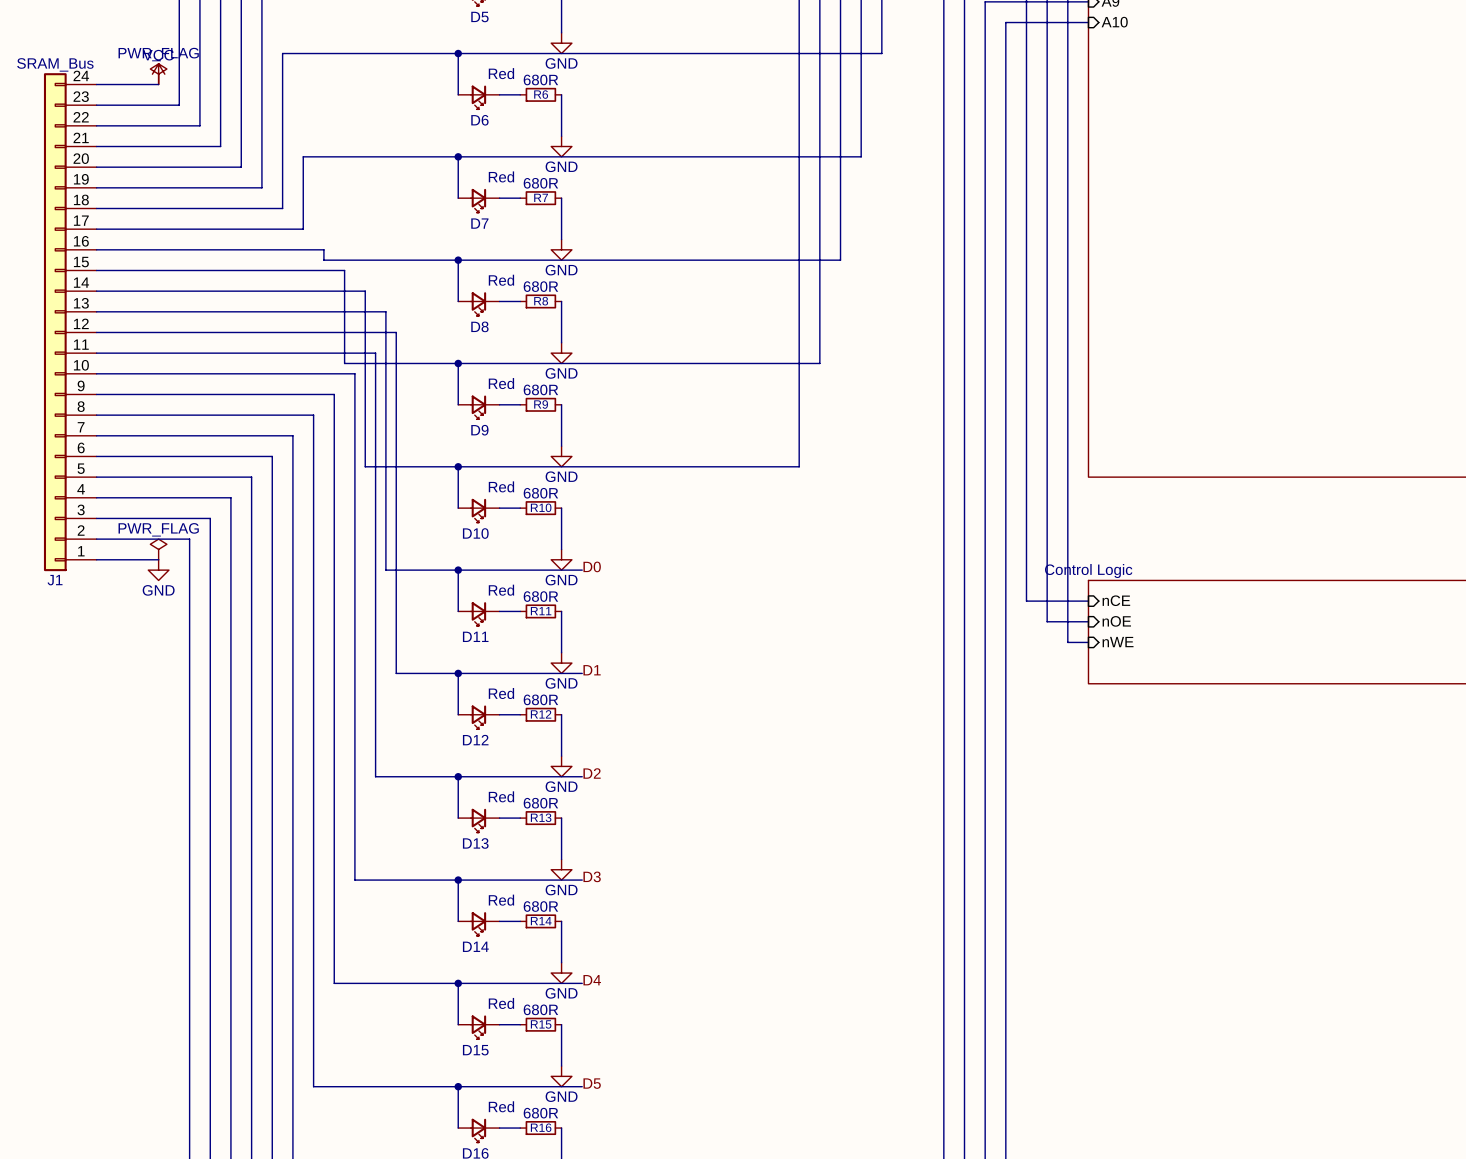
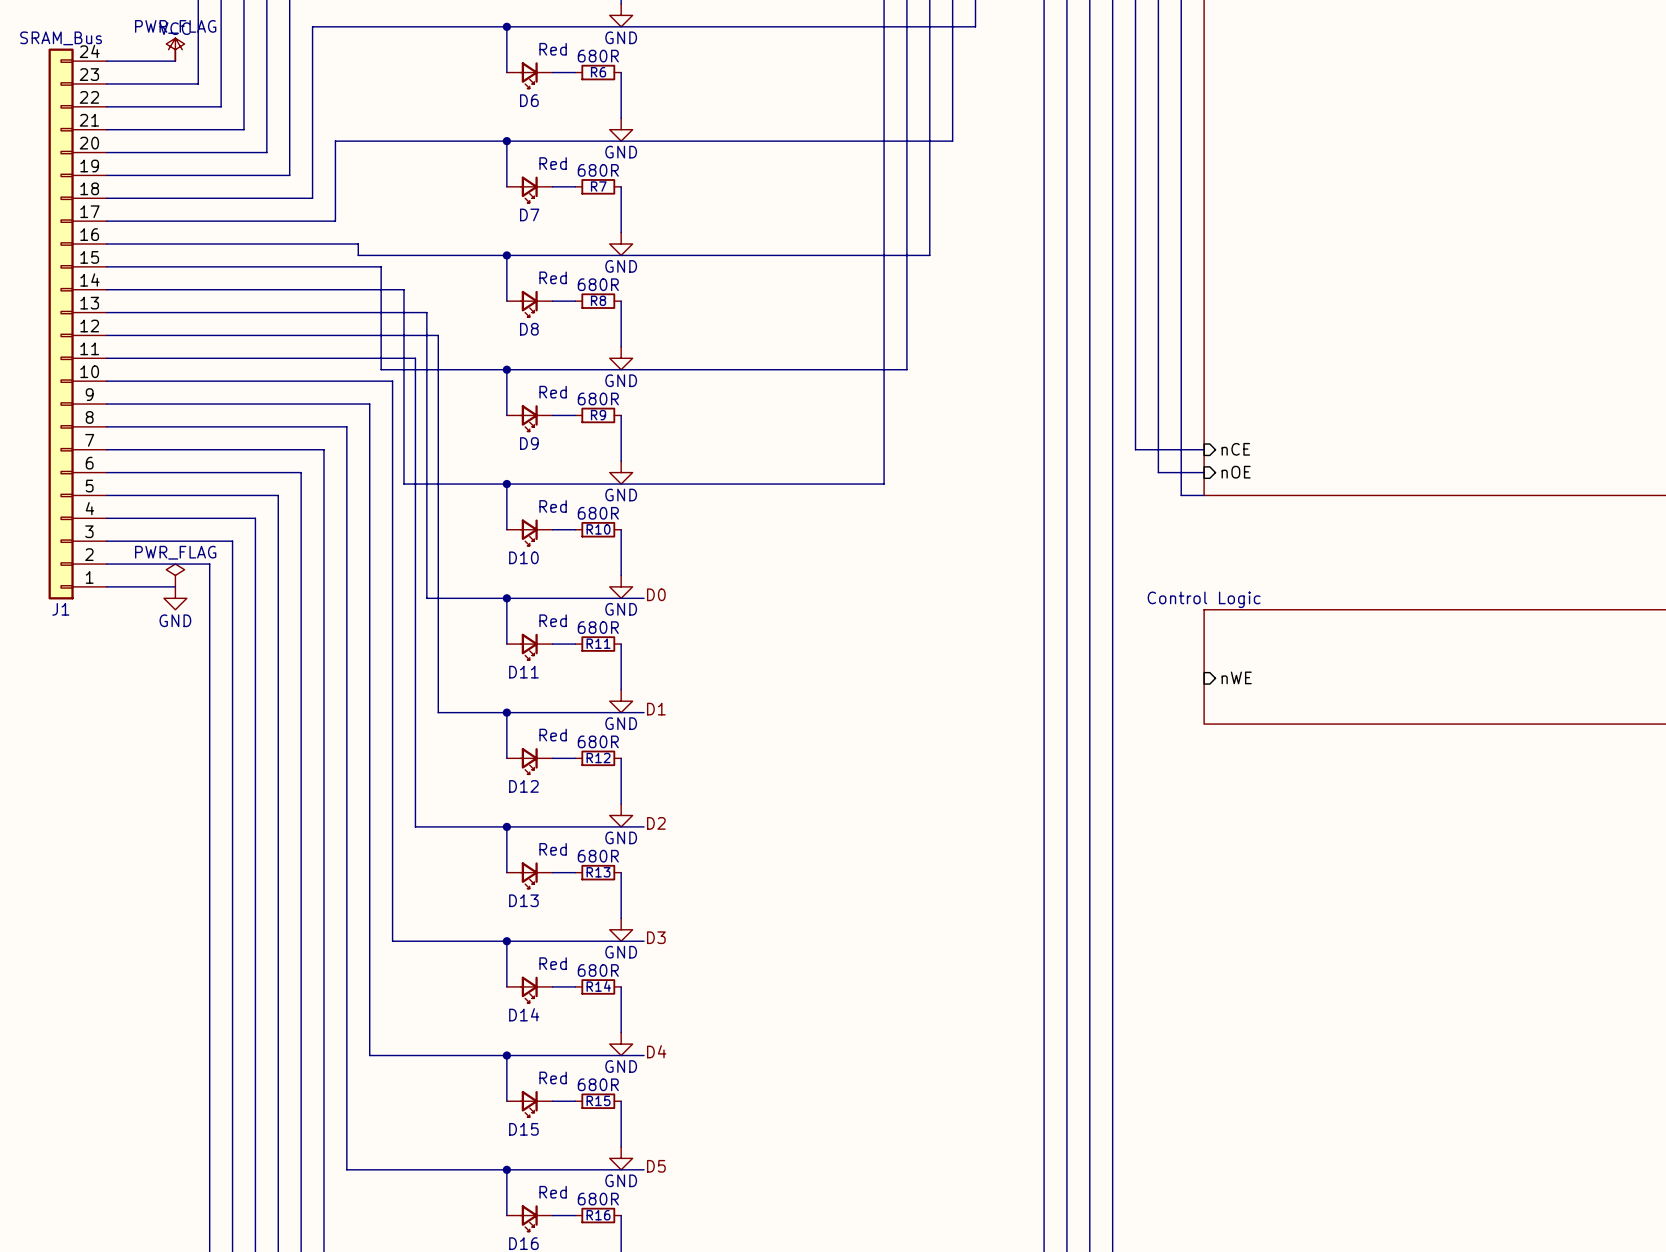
wire: (1026, 435) (1026, 601) (1088, 601) -> (1135, 449) (1204, 449)
wire: (1047, 456) (1047, 621) (1088, 621) -> (1158, 472) (1204, 472)
wire: (1067, 477) (1067, 642) (1088, 642) -> (1181, 495) (1204, 495)
sheet pin position: nCE (1116, 600) -> nCE (1235, 449)
sheet pin position: nOE (1116, 621) -> nOE (1236, 472)

